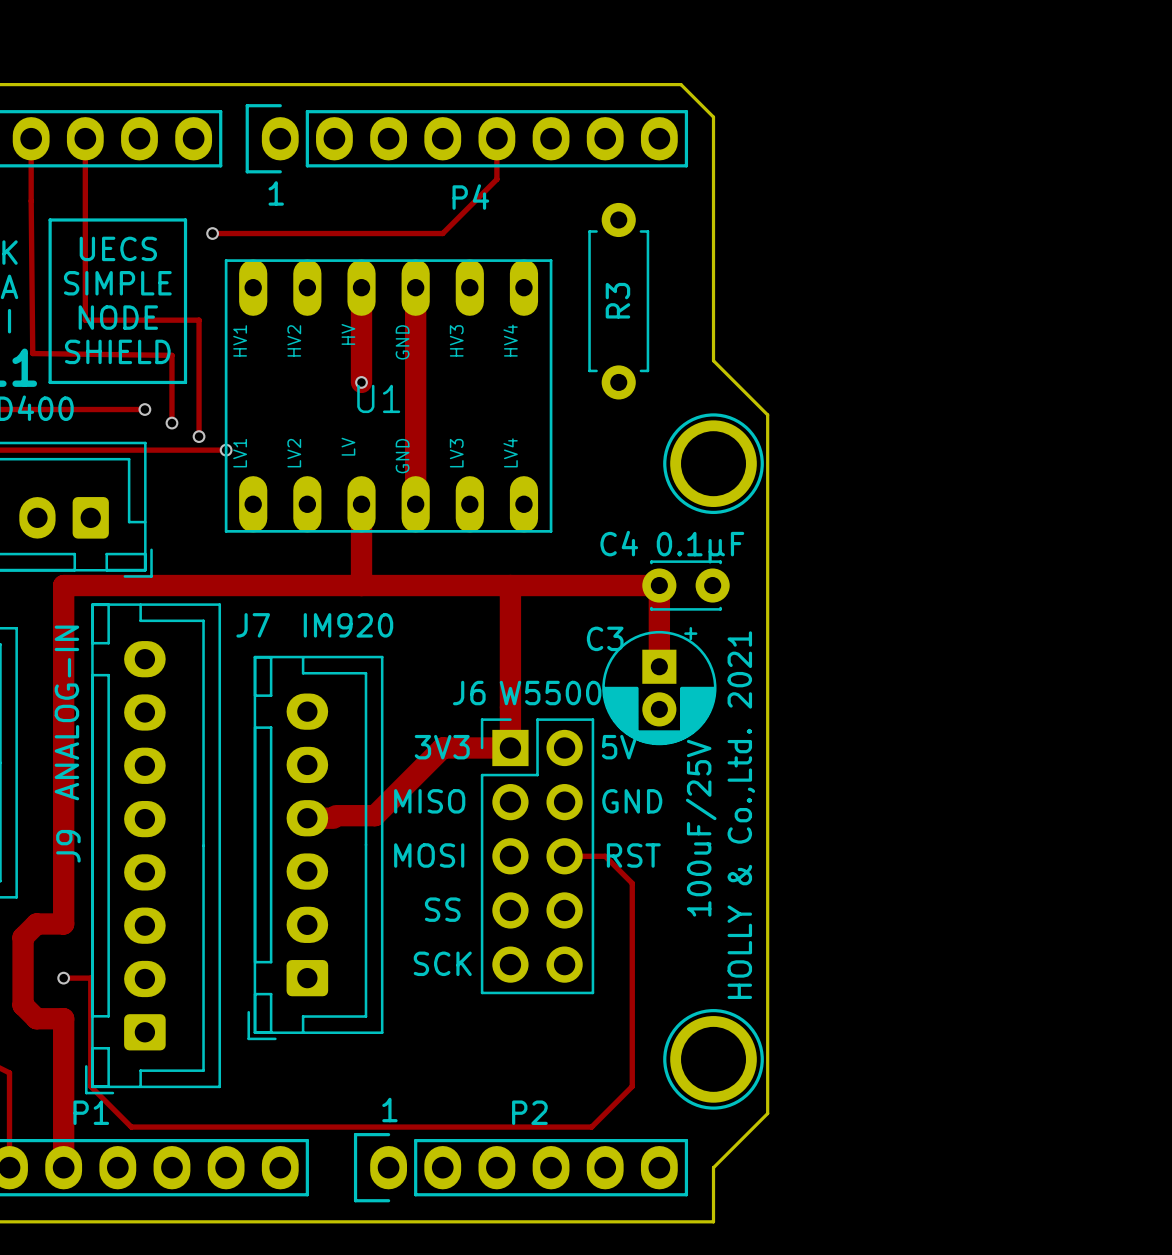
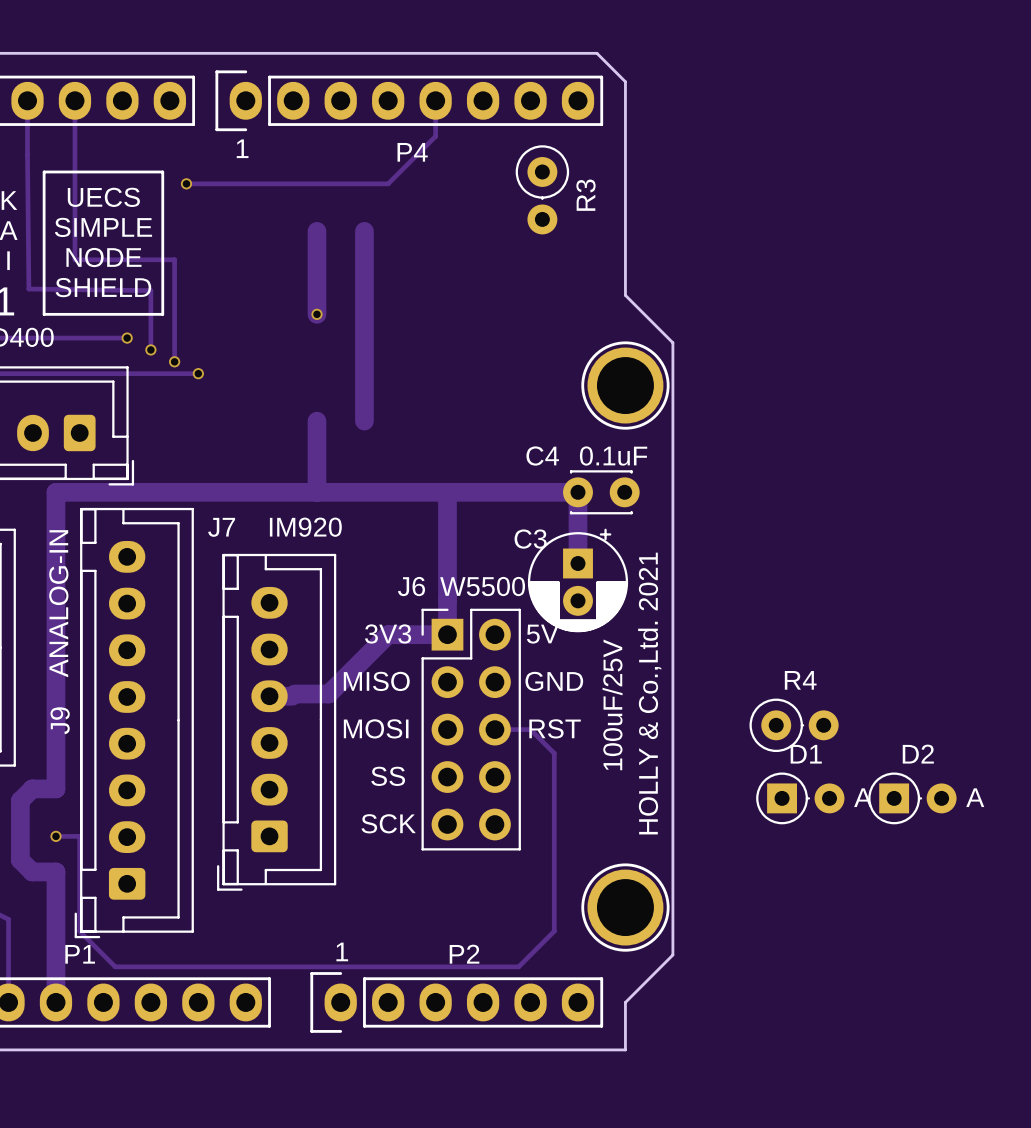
R3 footprint: [588, 202, 650, 400] -> [515, 145, 570, 235]
R3 name position: R3 (617, 300) -> R3 (585, 195)
U1: (388, 395) -> none
C4 value: 0.1μF (700, 547) -> 0.1uF (613, 456)
R4: none -> (794, 725)
D1: none -> (800, 798)
D2: none -> (912, 798)

